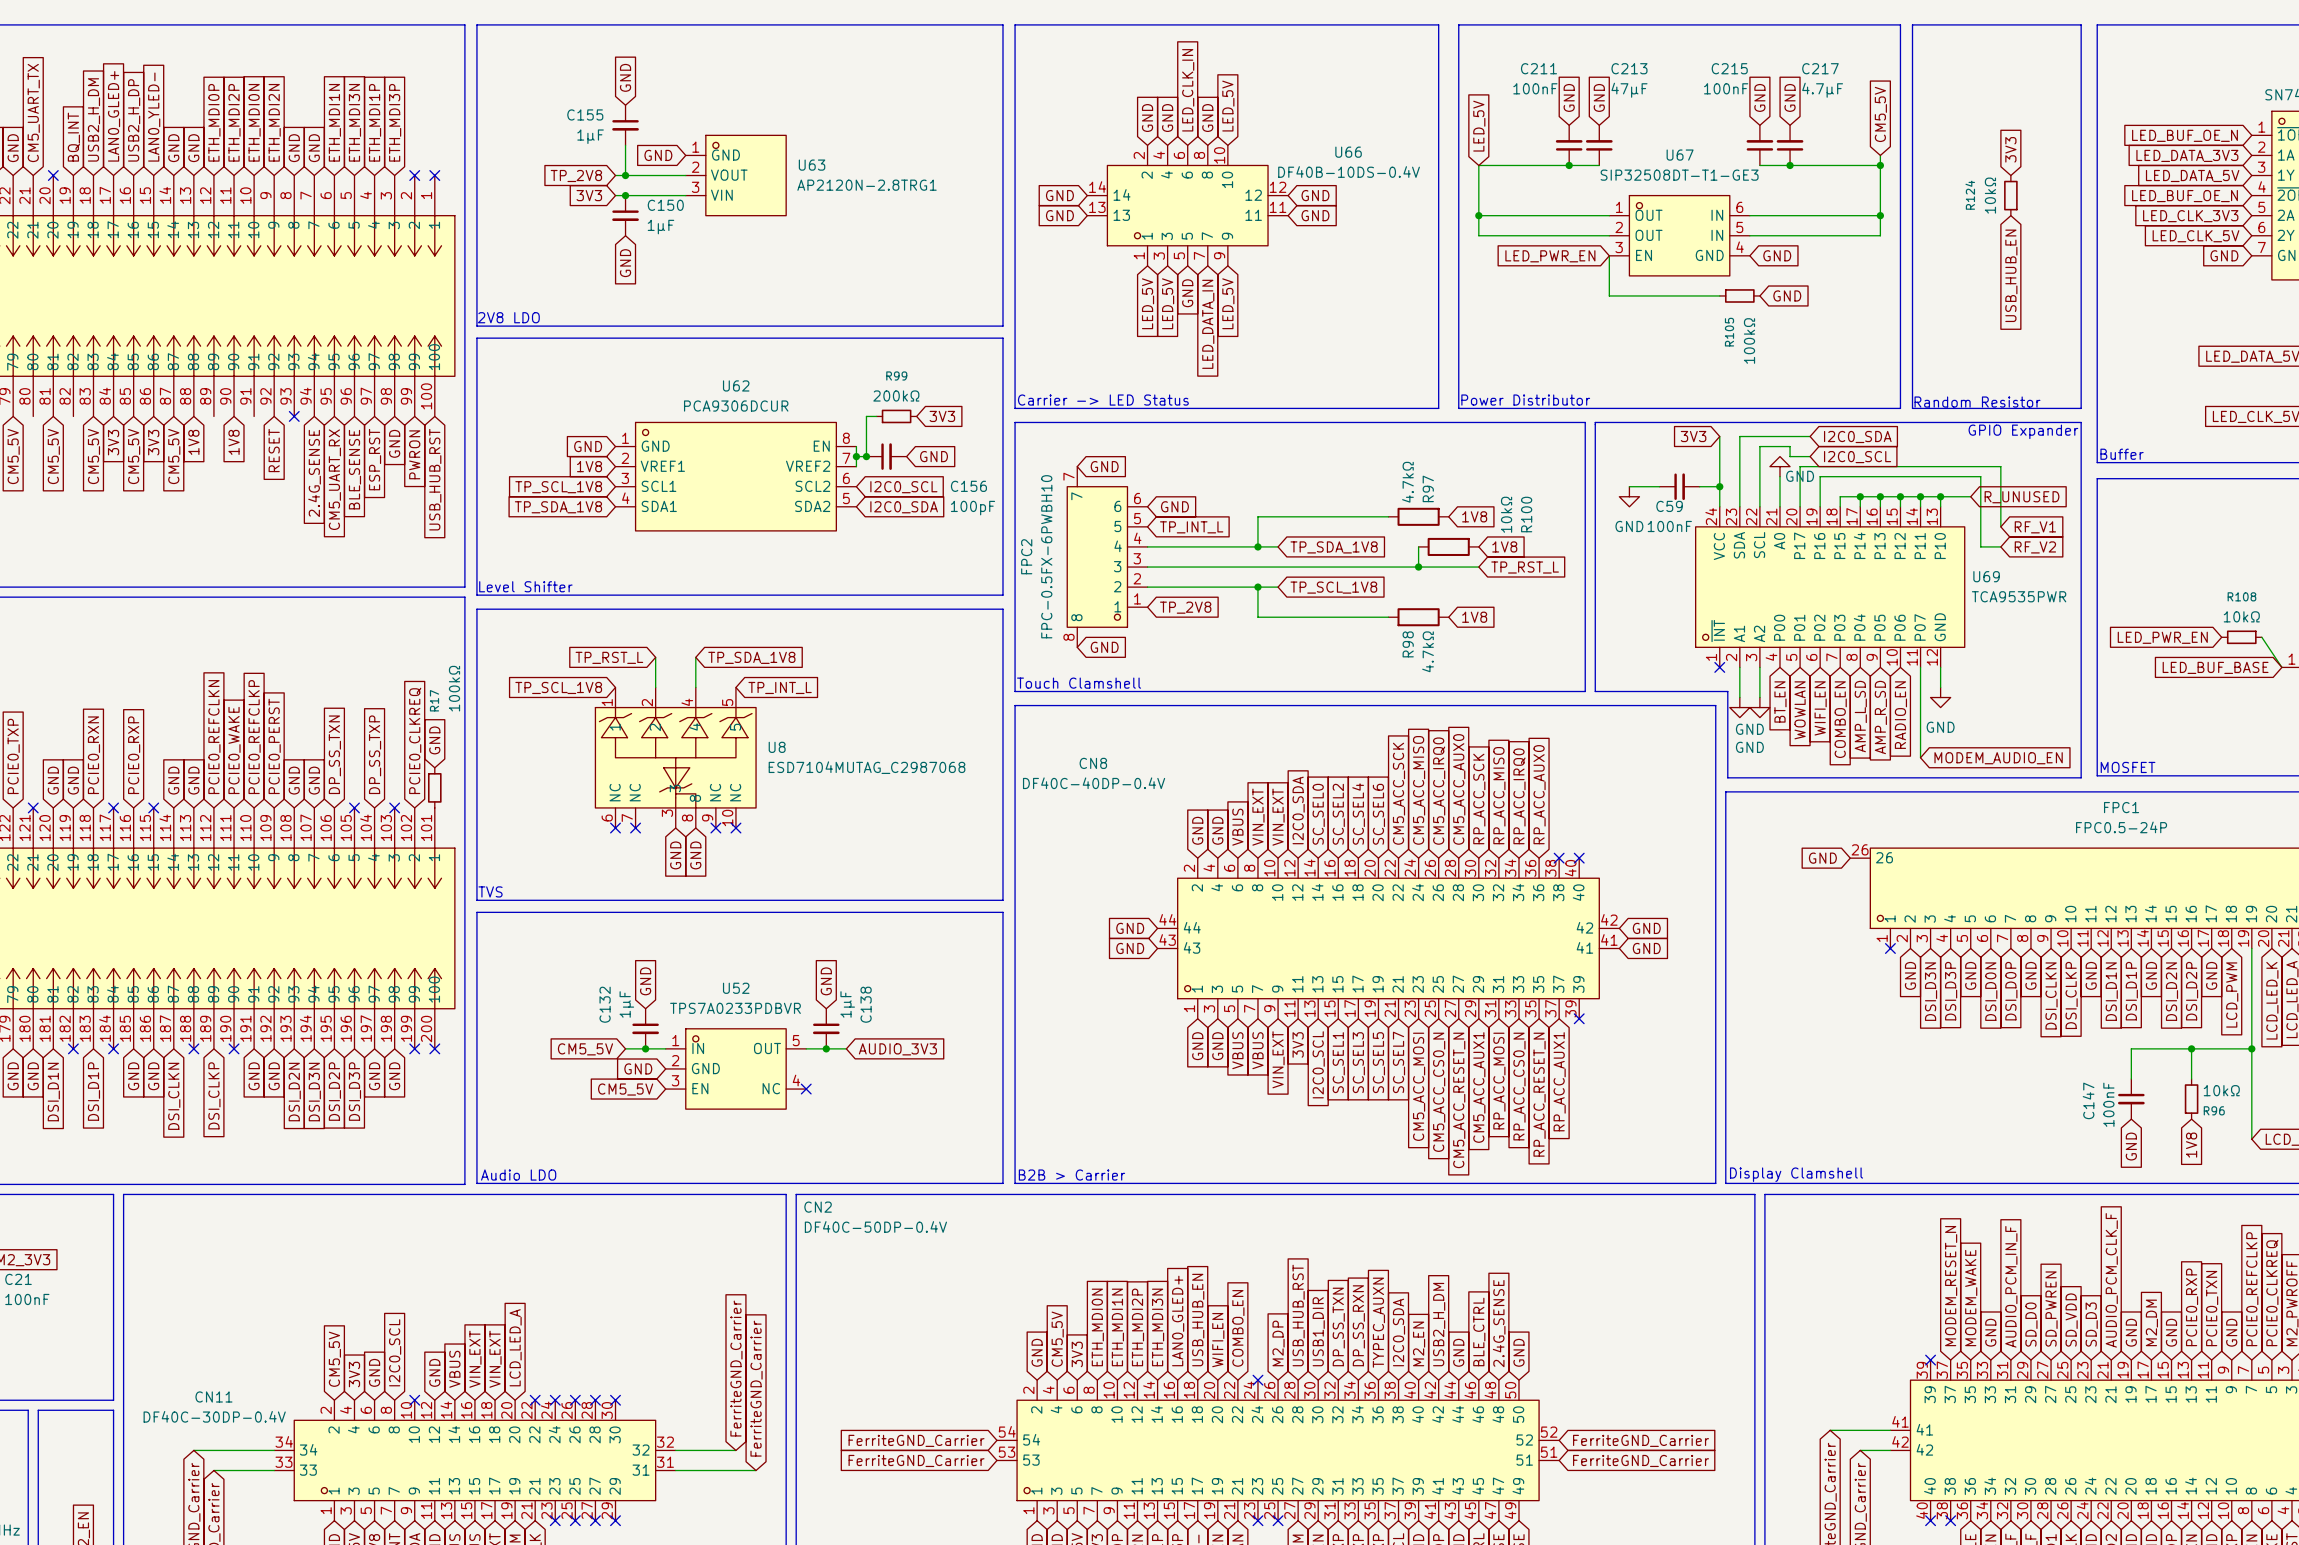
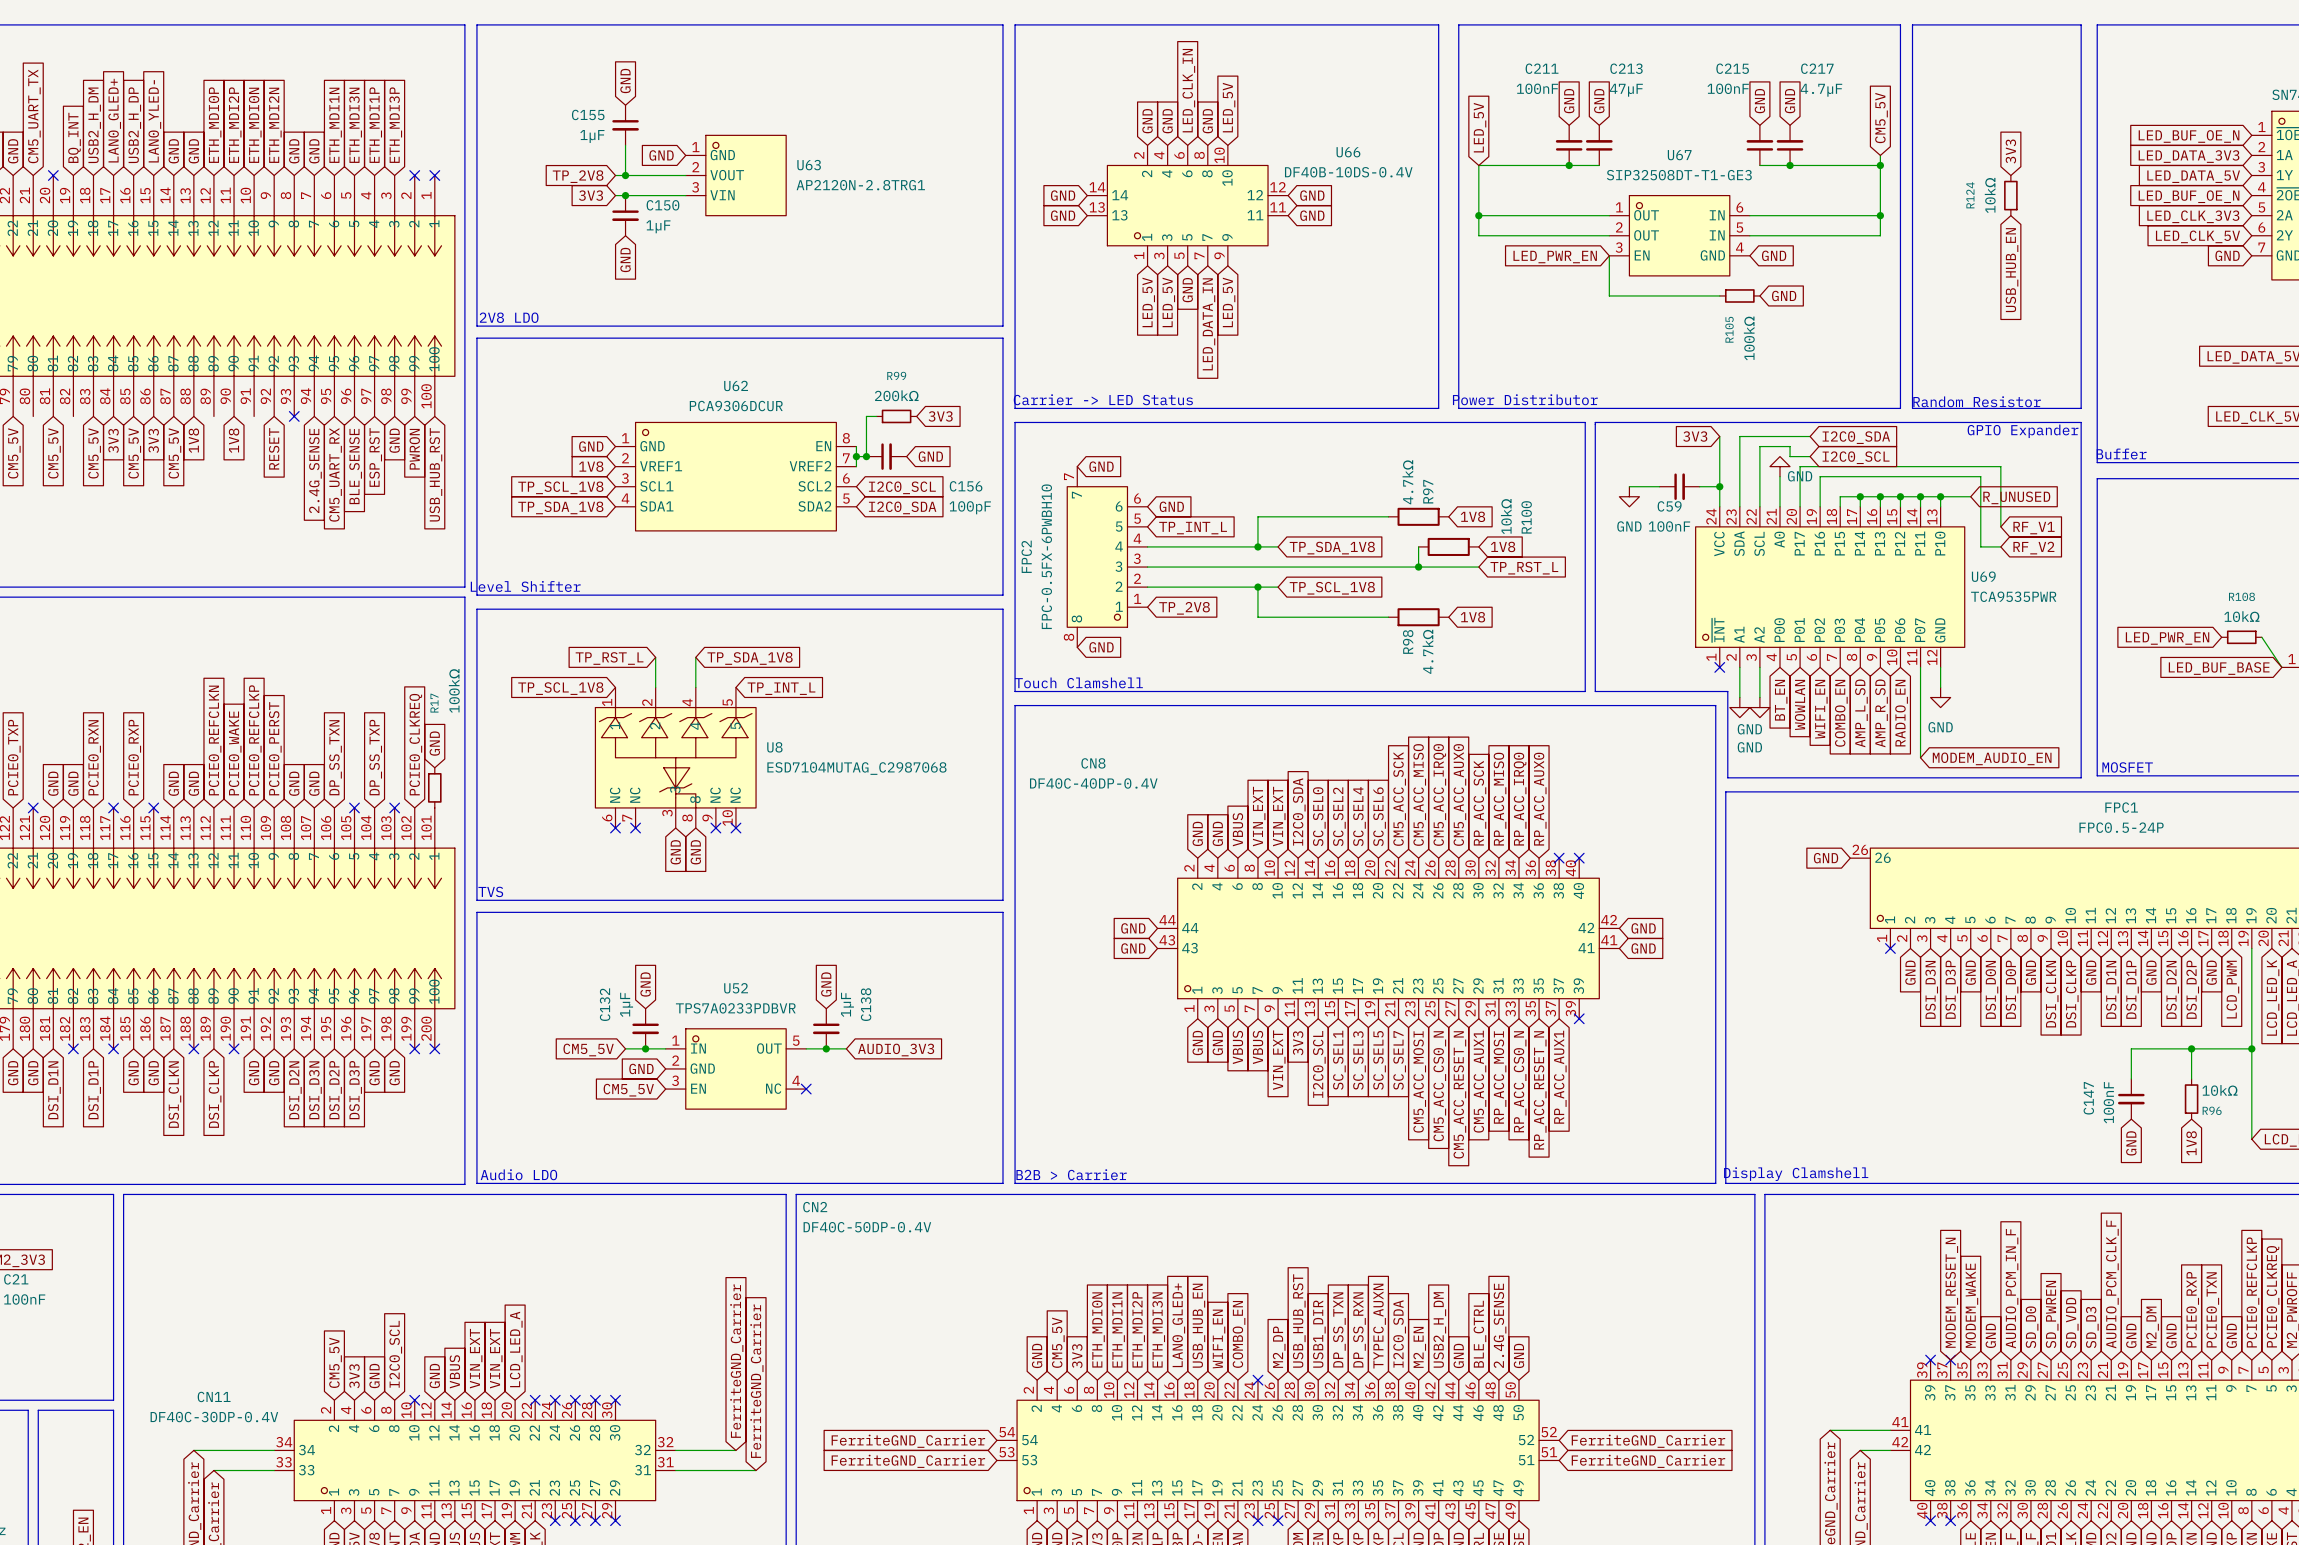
no-connect mark: none -> (1950, 1360)

